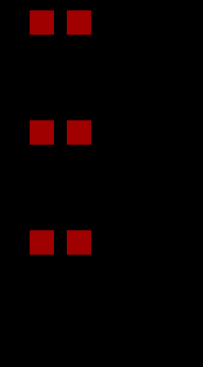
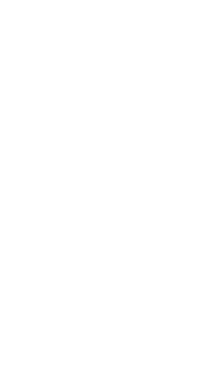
part: (60, 22) -> none
part: (60, 132) -> none
part: (60, 242) -> none

